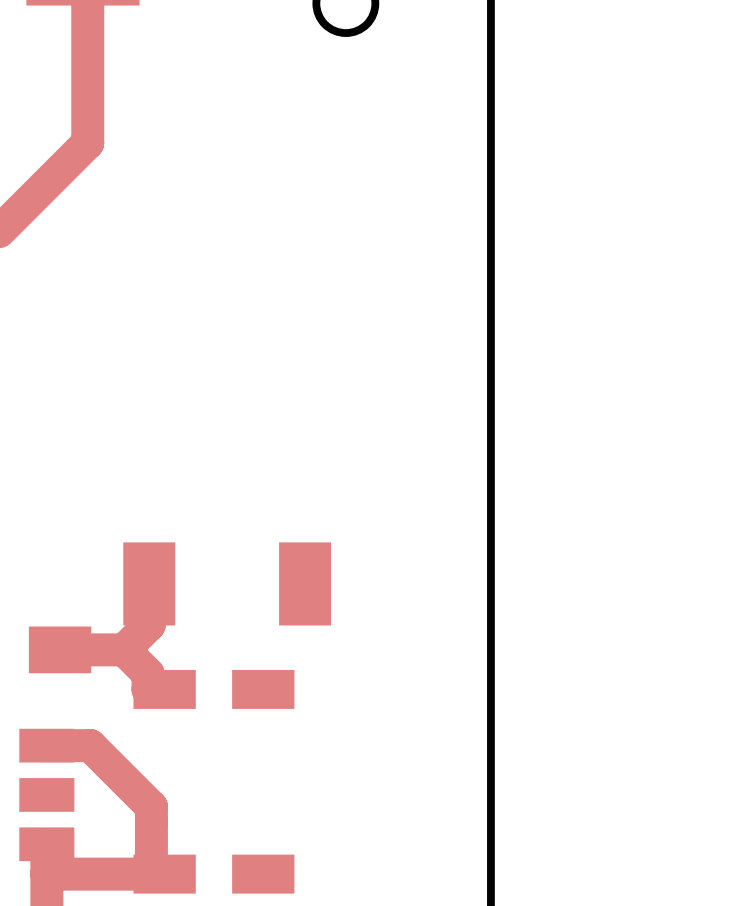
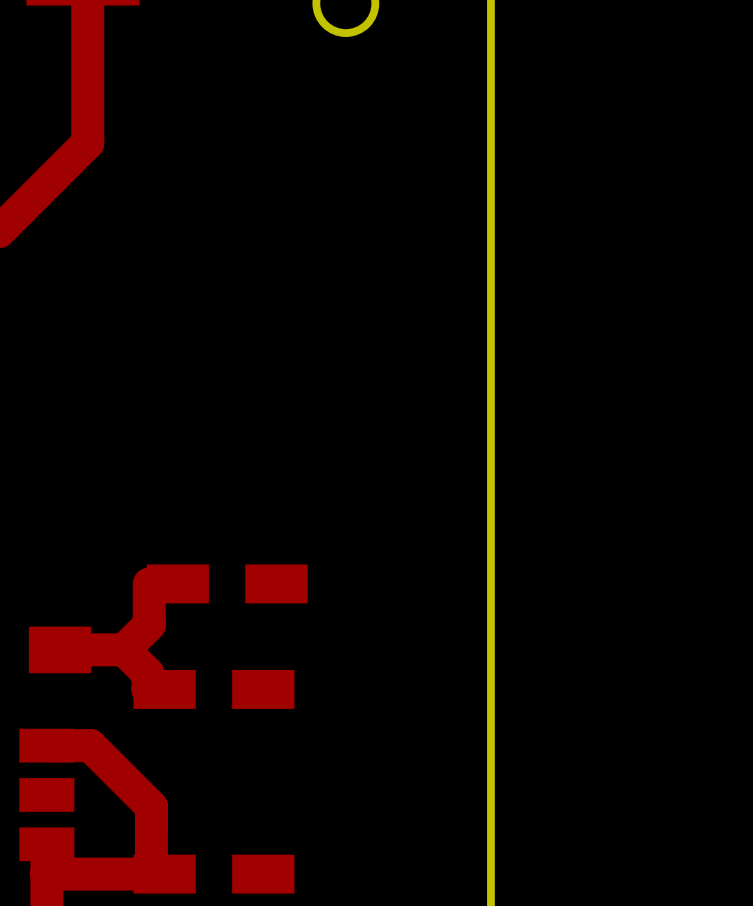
part footprint: [123, 542, 332, 626] -> [146, 564, 308, 604]

